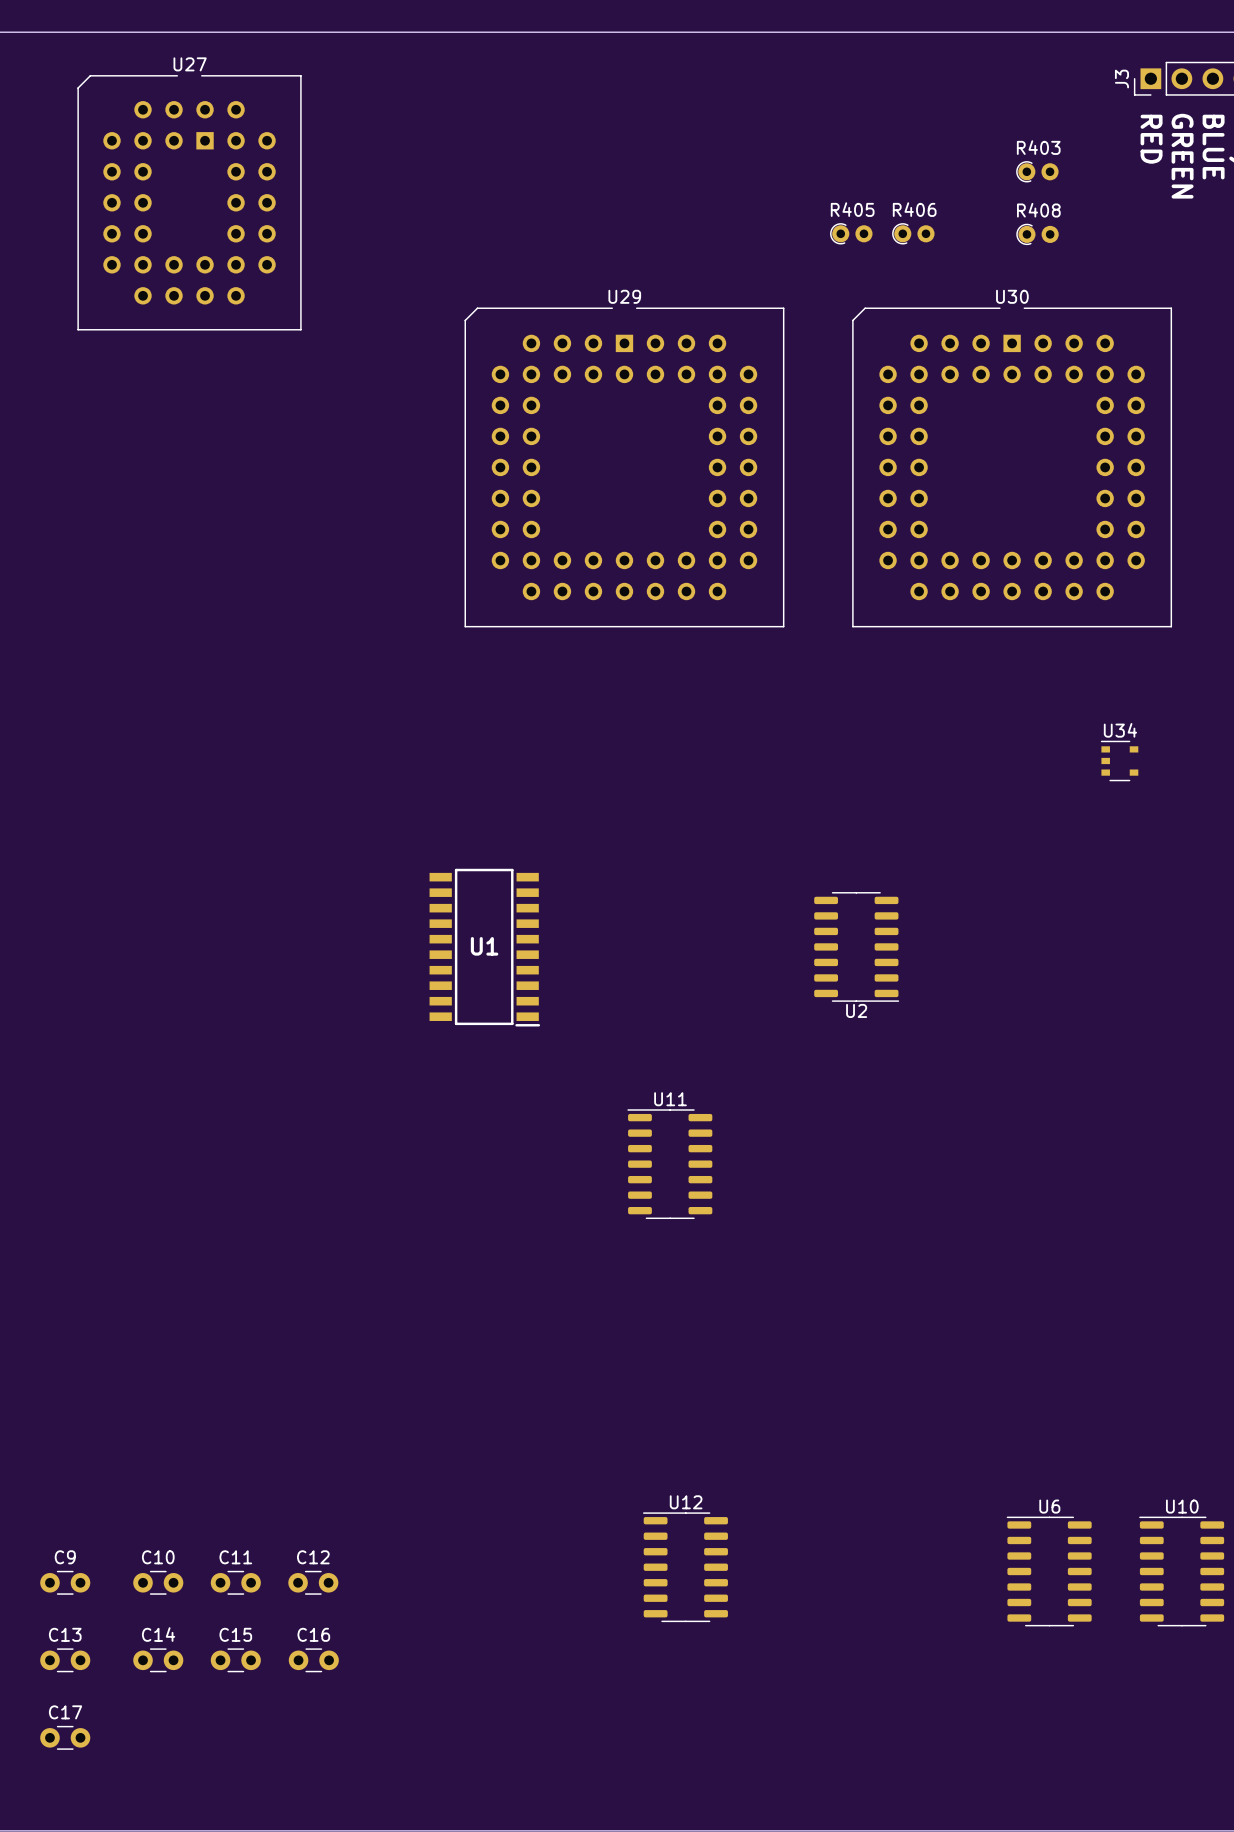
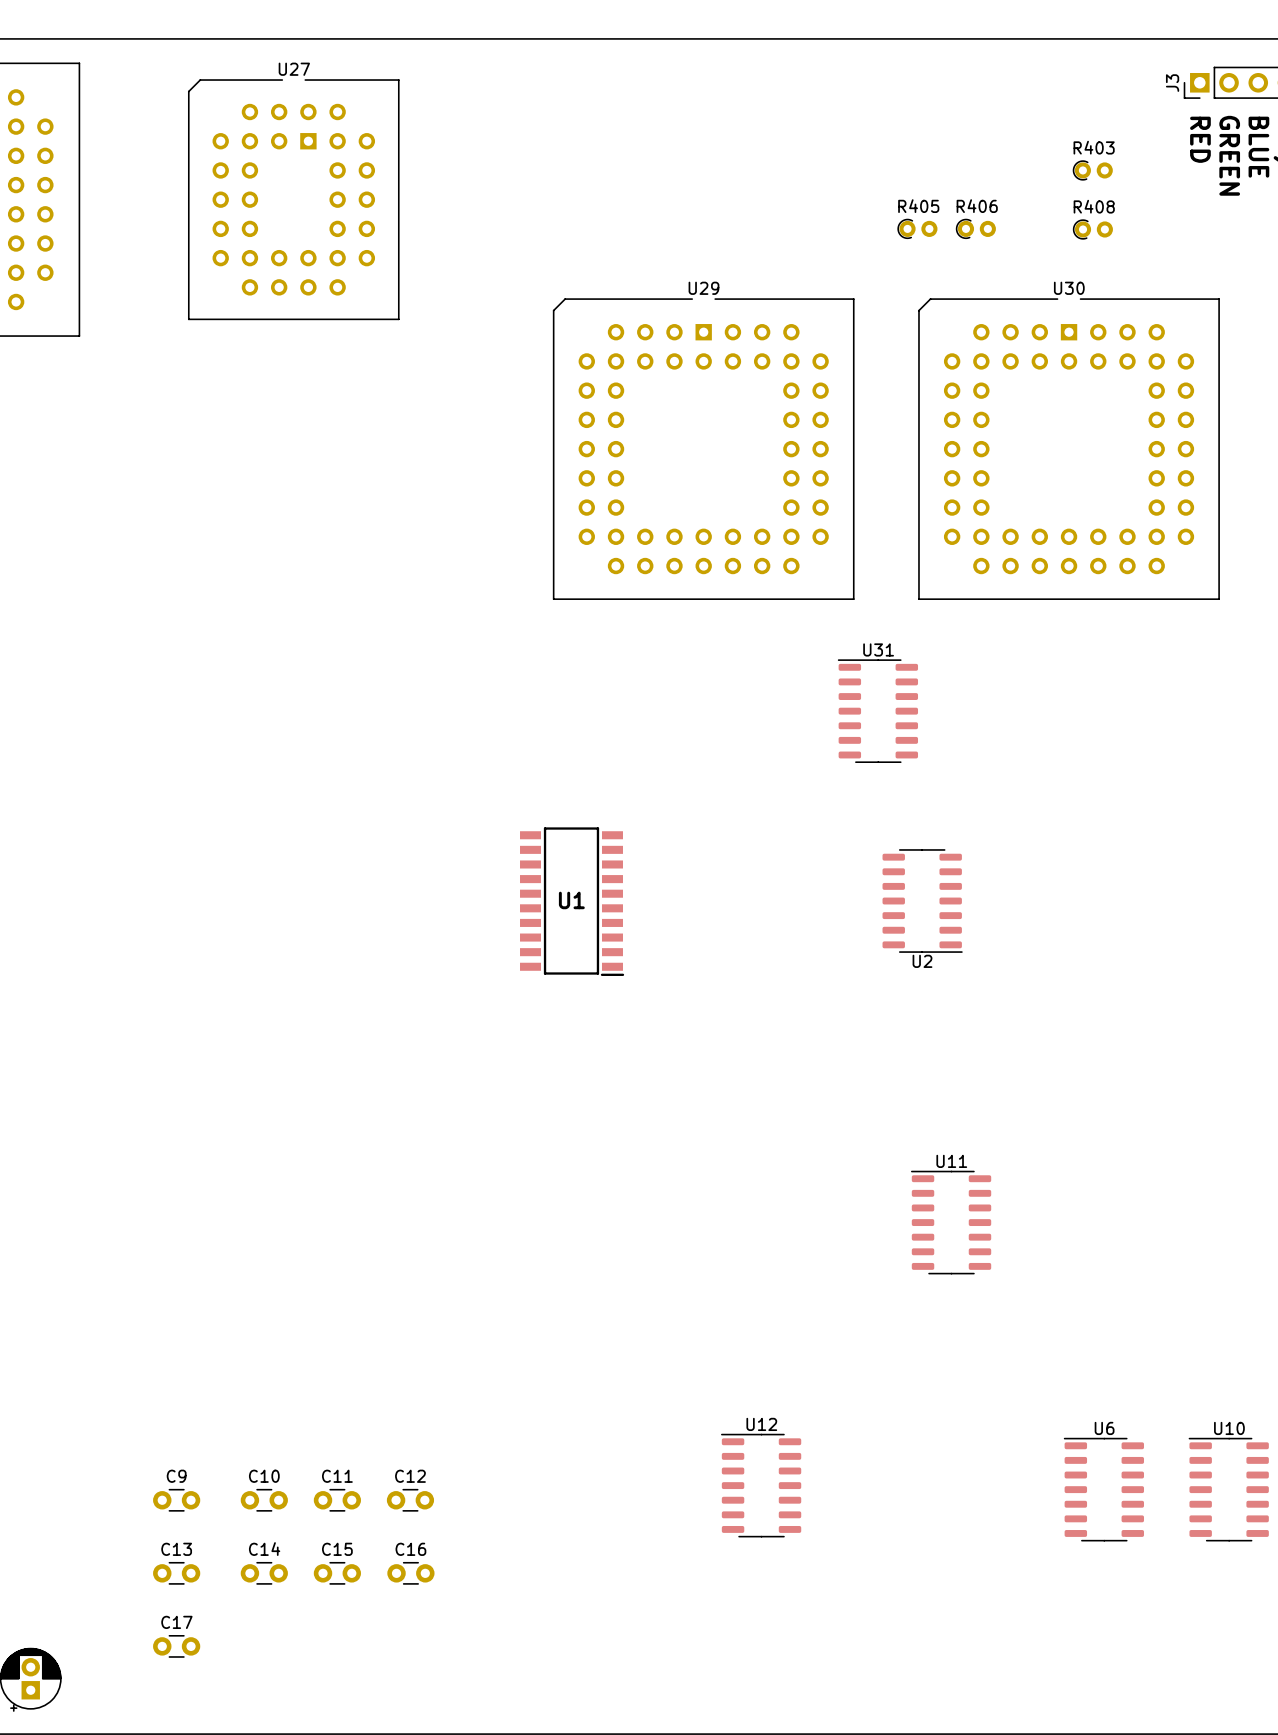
U31: none -> (877, 711)
U34: (1119, 760) -> none
U11 position: (669, 1164) -> (951, 1222)

